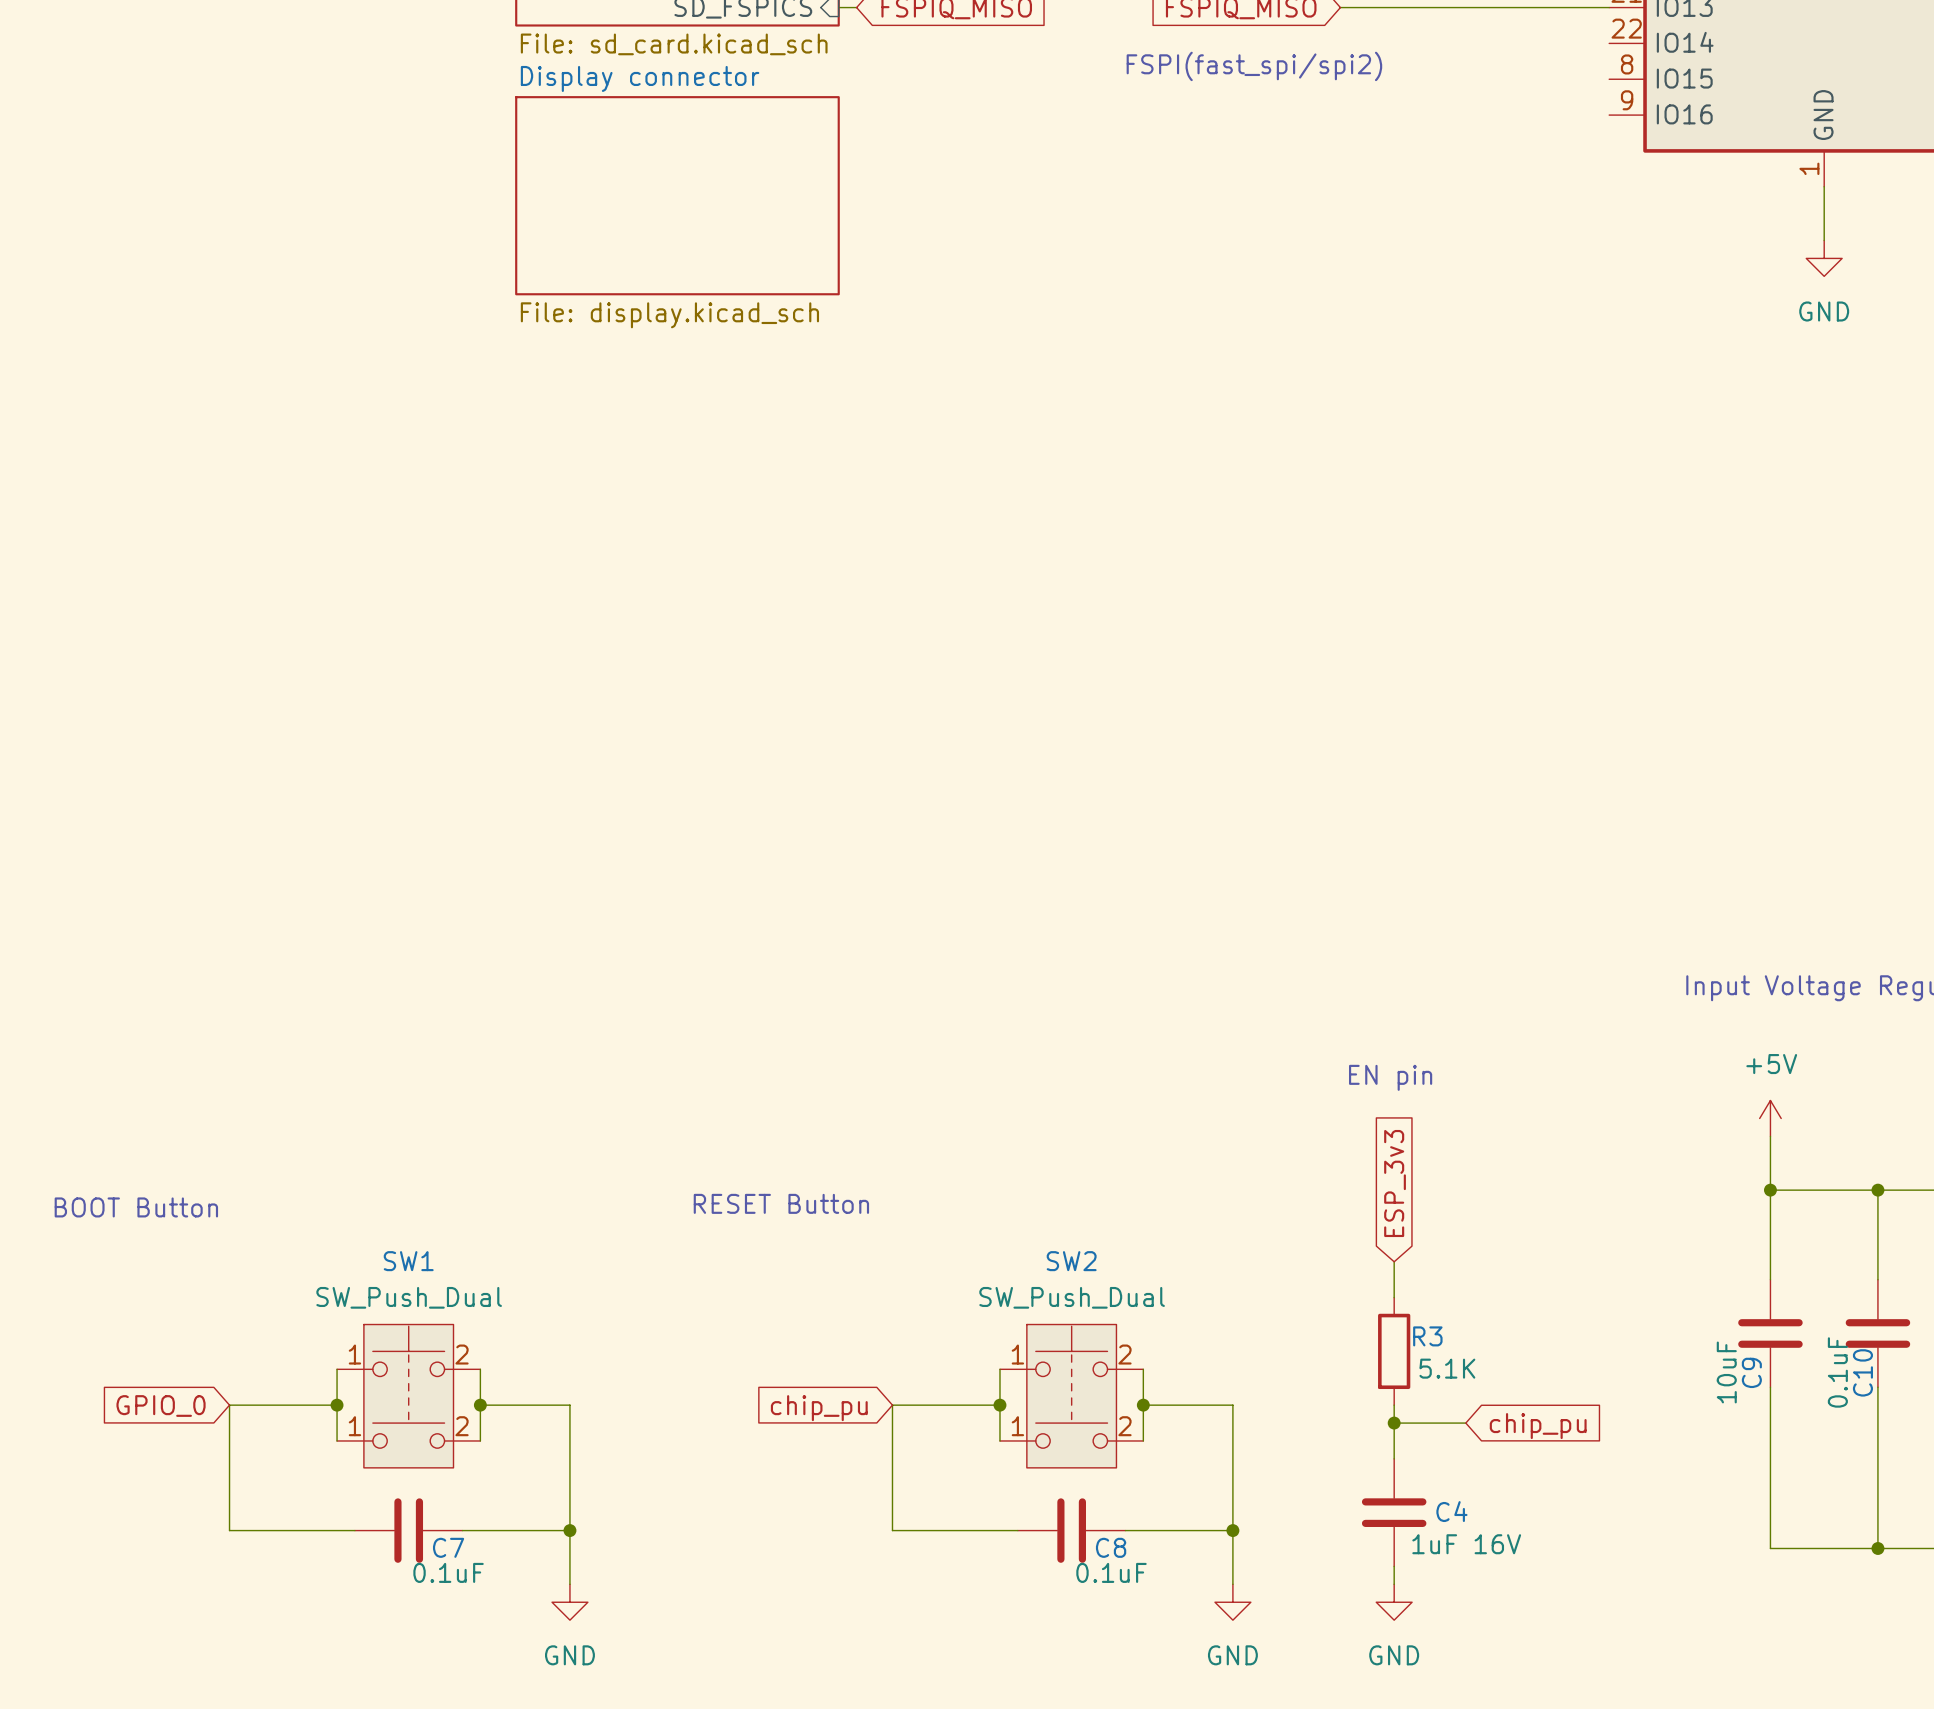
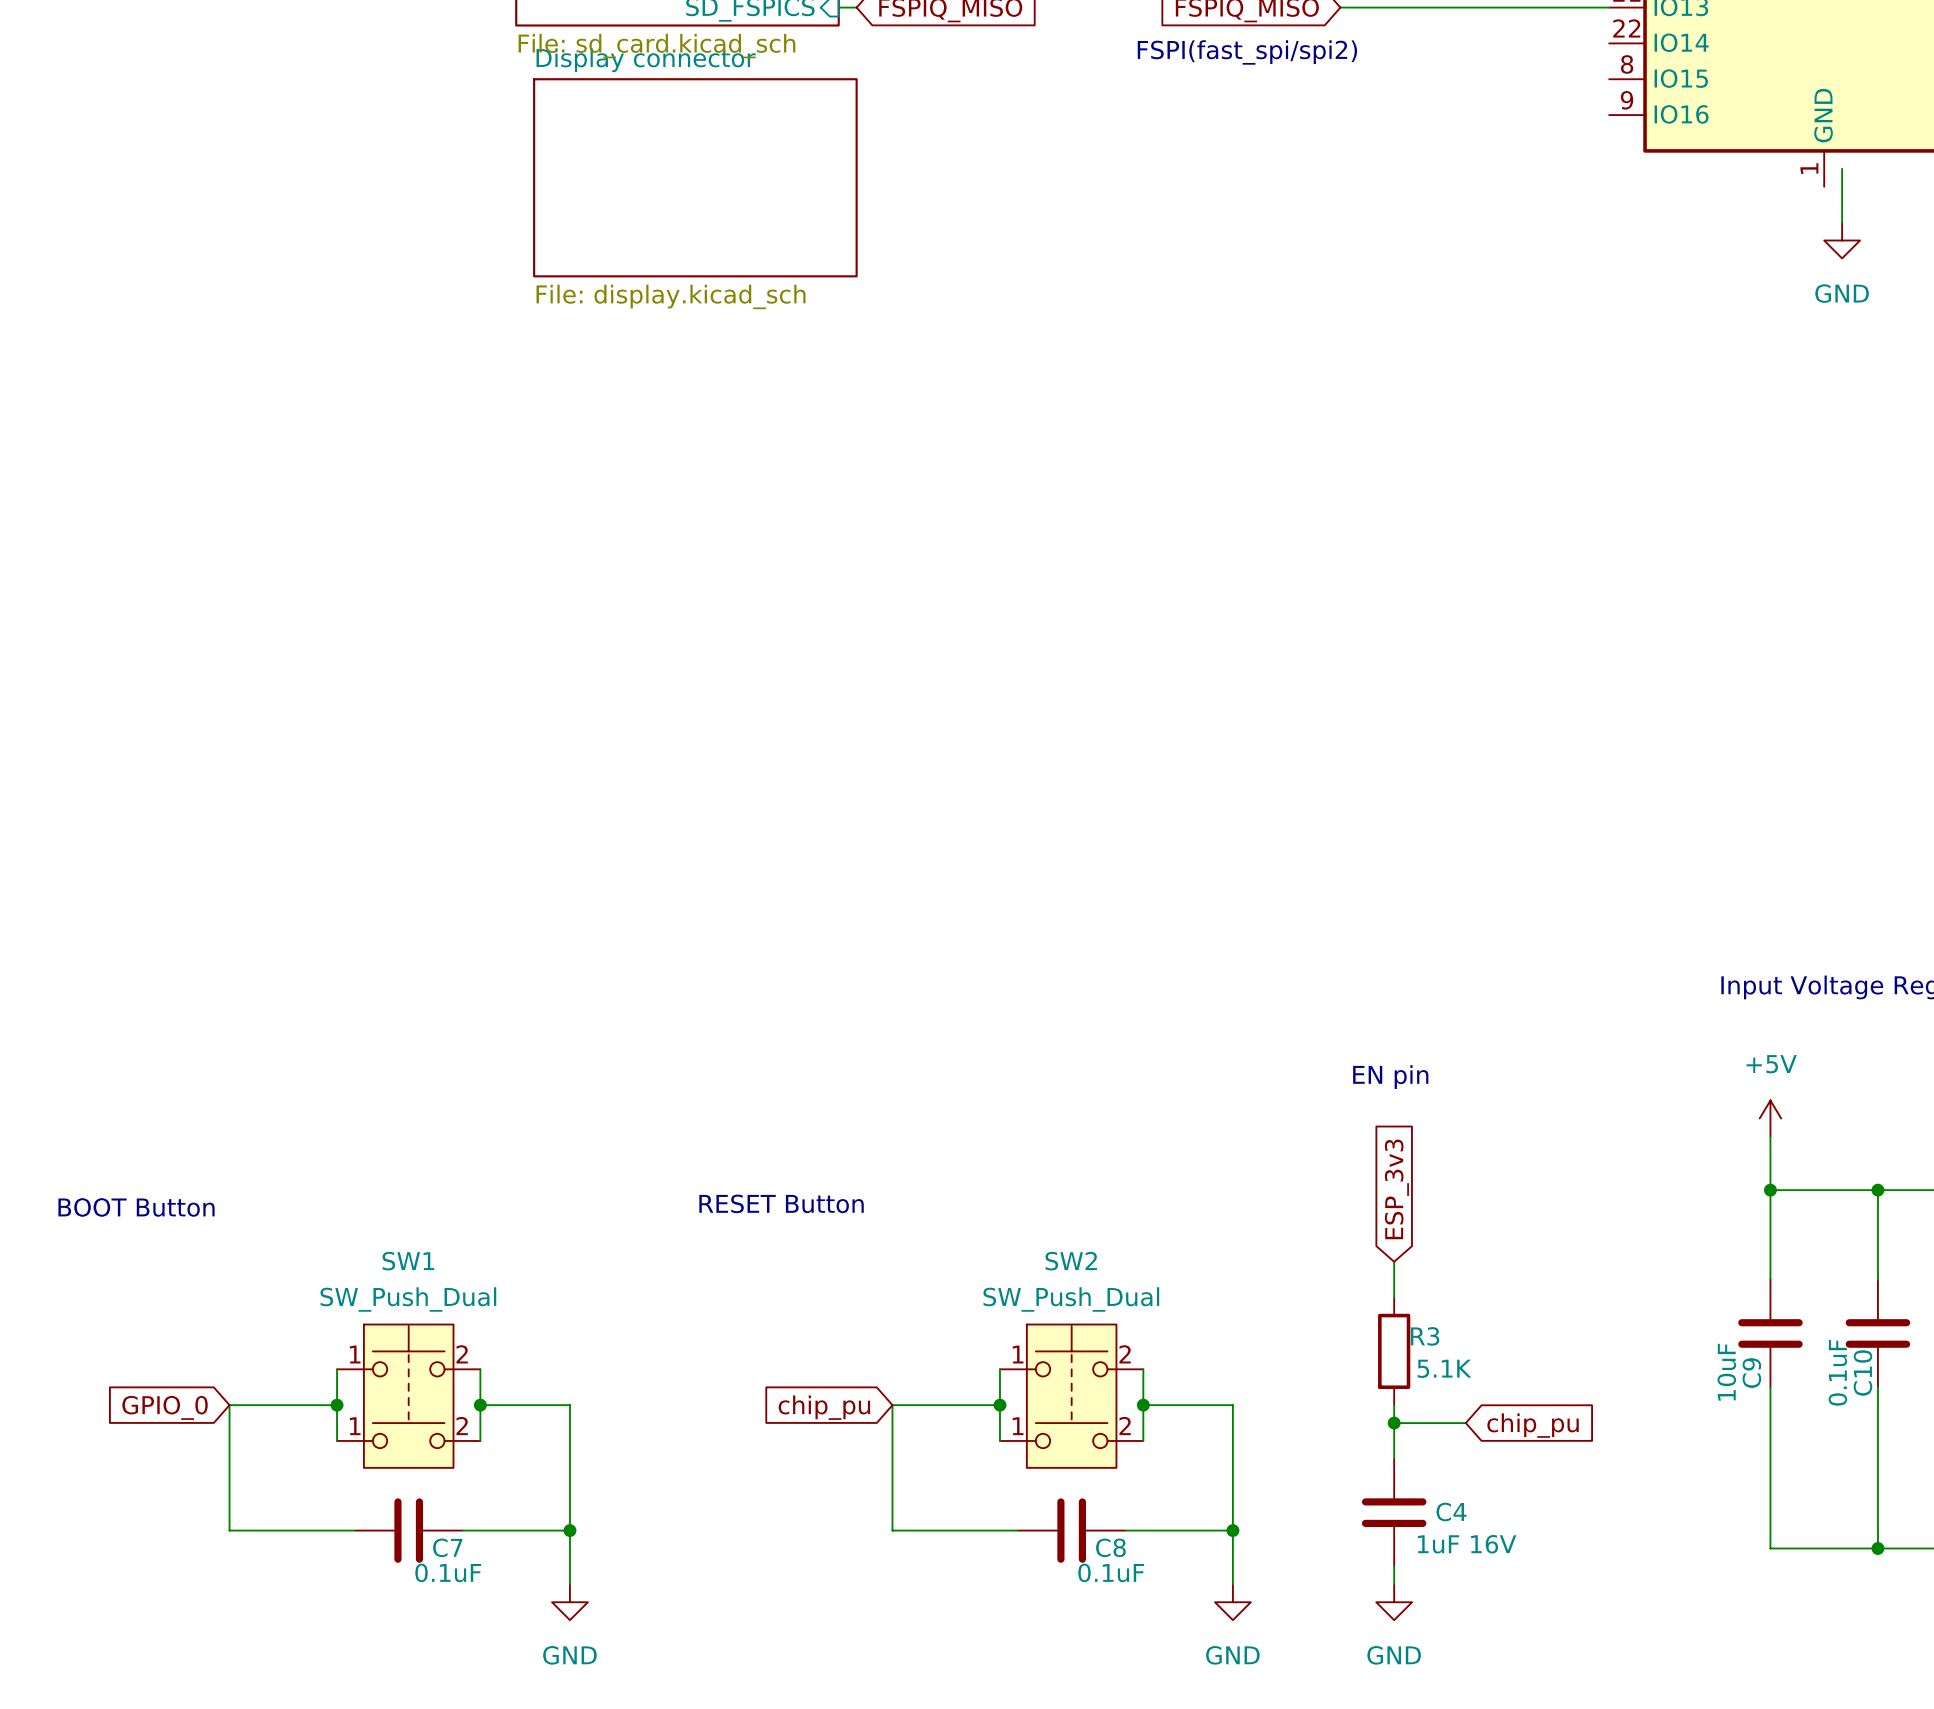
text position: FSPI(fast_spi/spi2) (1254, 66) -> FSPI(fast_spi/spi2) (1247, 52)
wire: (1824, 186) (1824, 240) -> (1842, 168) (1842, 222)
sheet Display connector position: (677, 195) -> (695, 177)
power symbol position: GND (1824, 258) -> GND (1842, 240)

